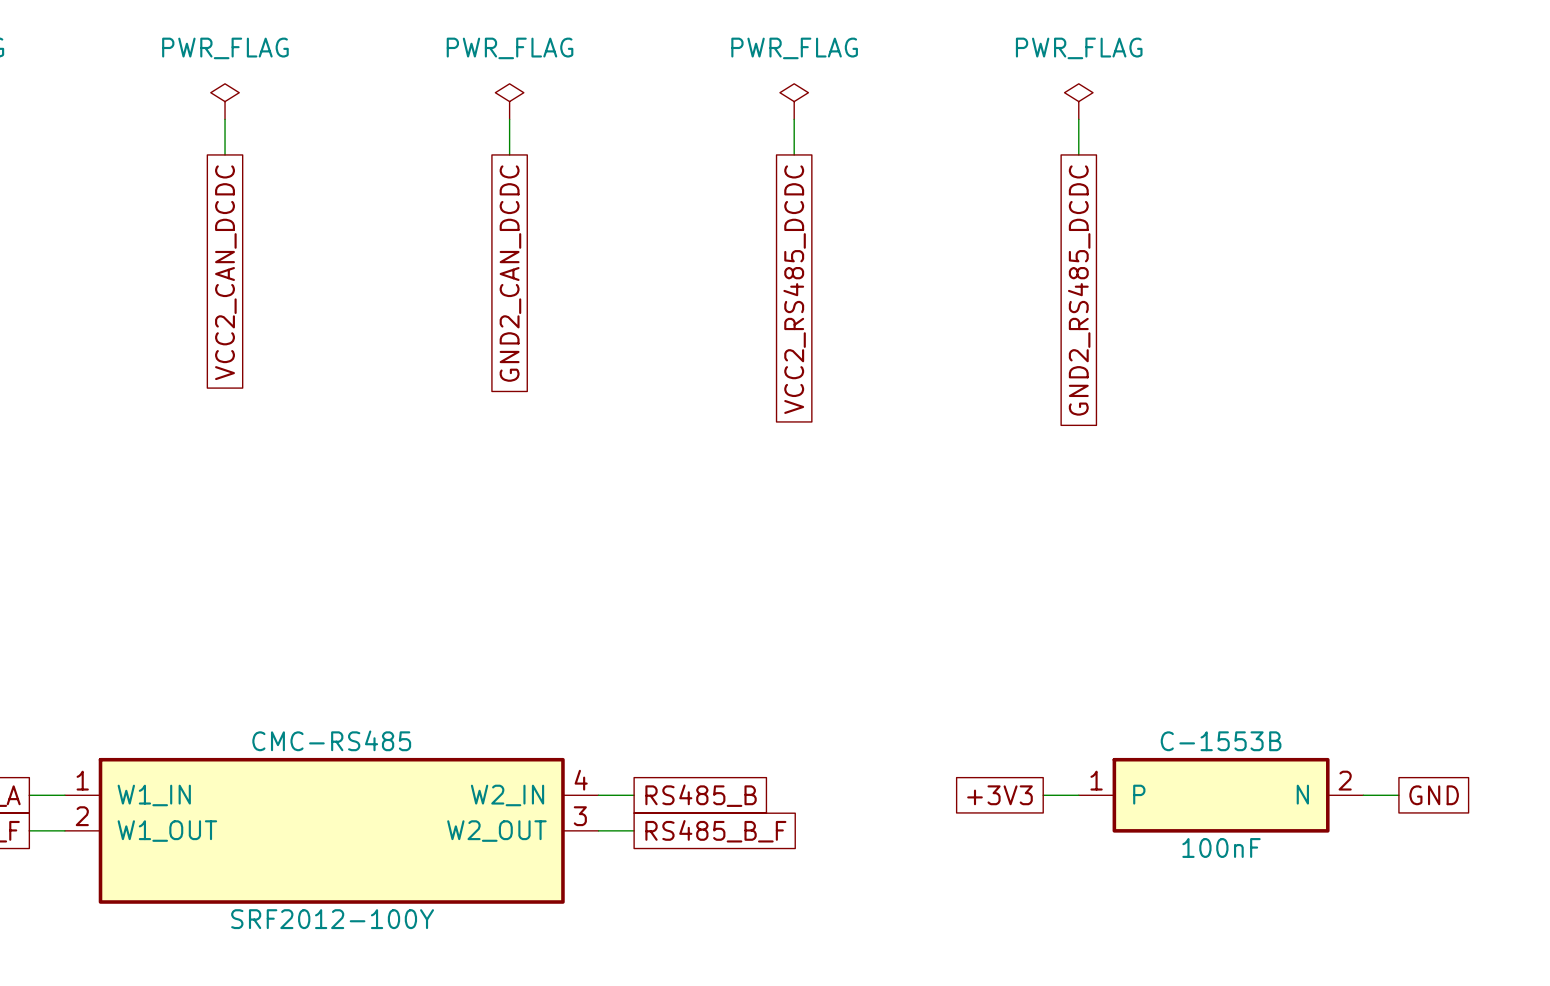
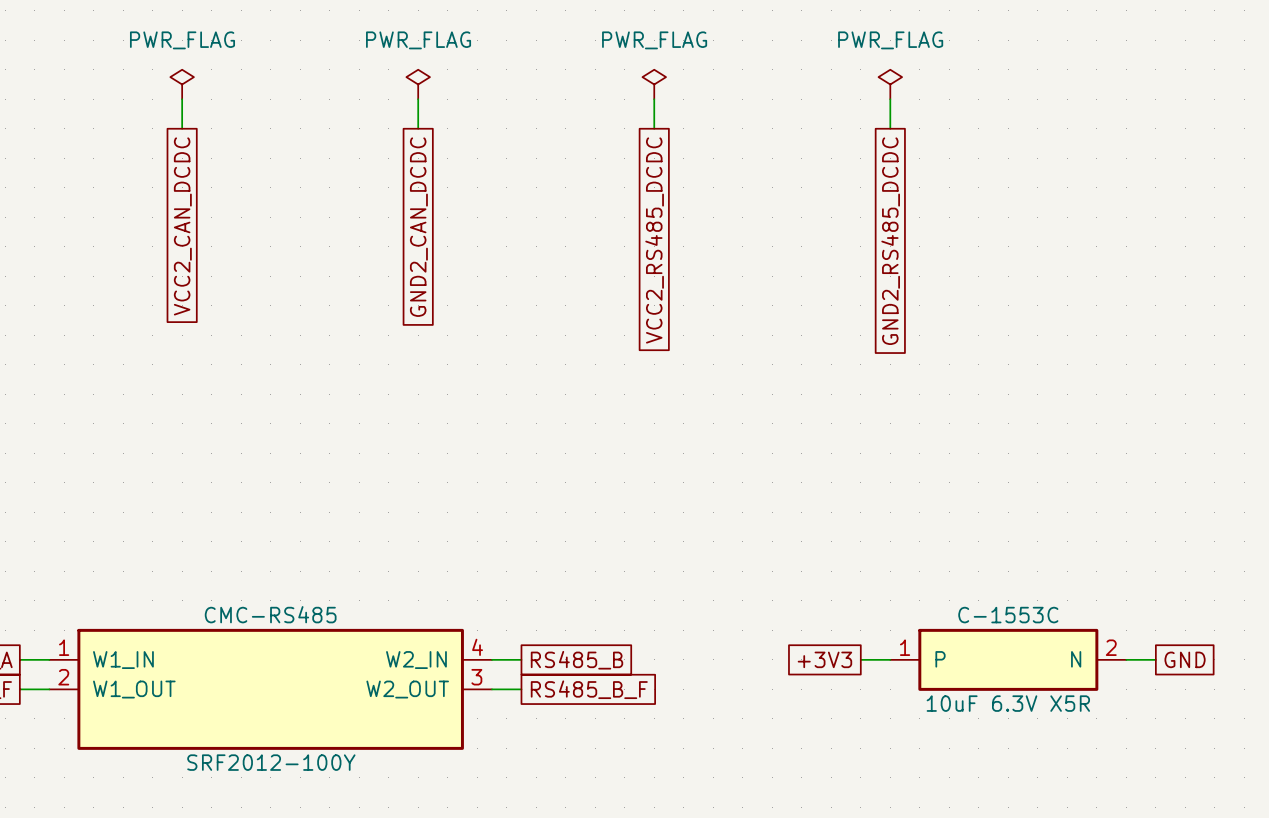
C-1553B name: C-1553B (1221, 741) -> C-1553C (1008, 615)
C-1553B value: 100nF (1221, 847) -> 10uF 6.3V X5R (1008, 703)

